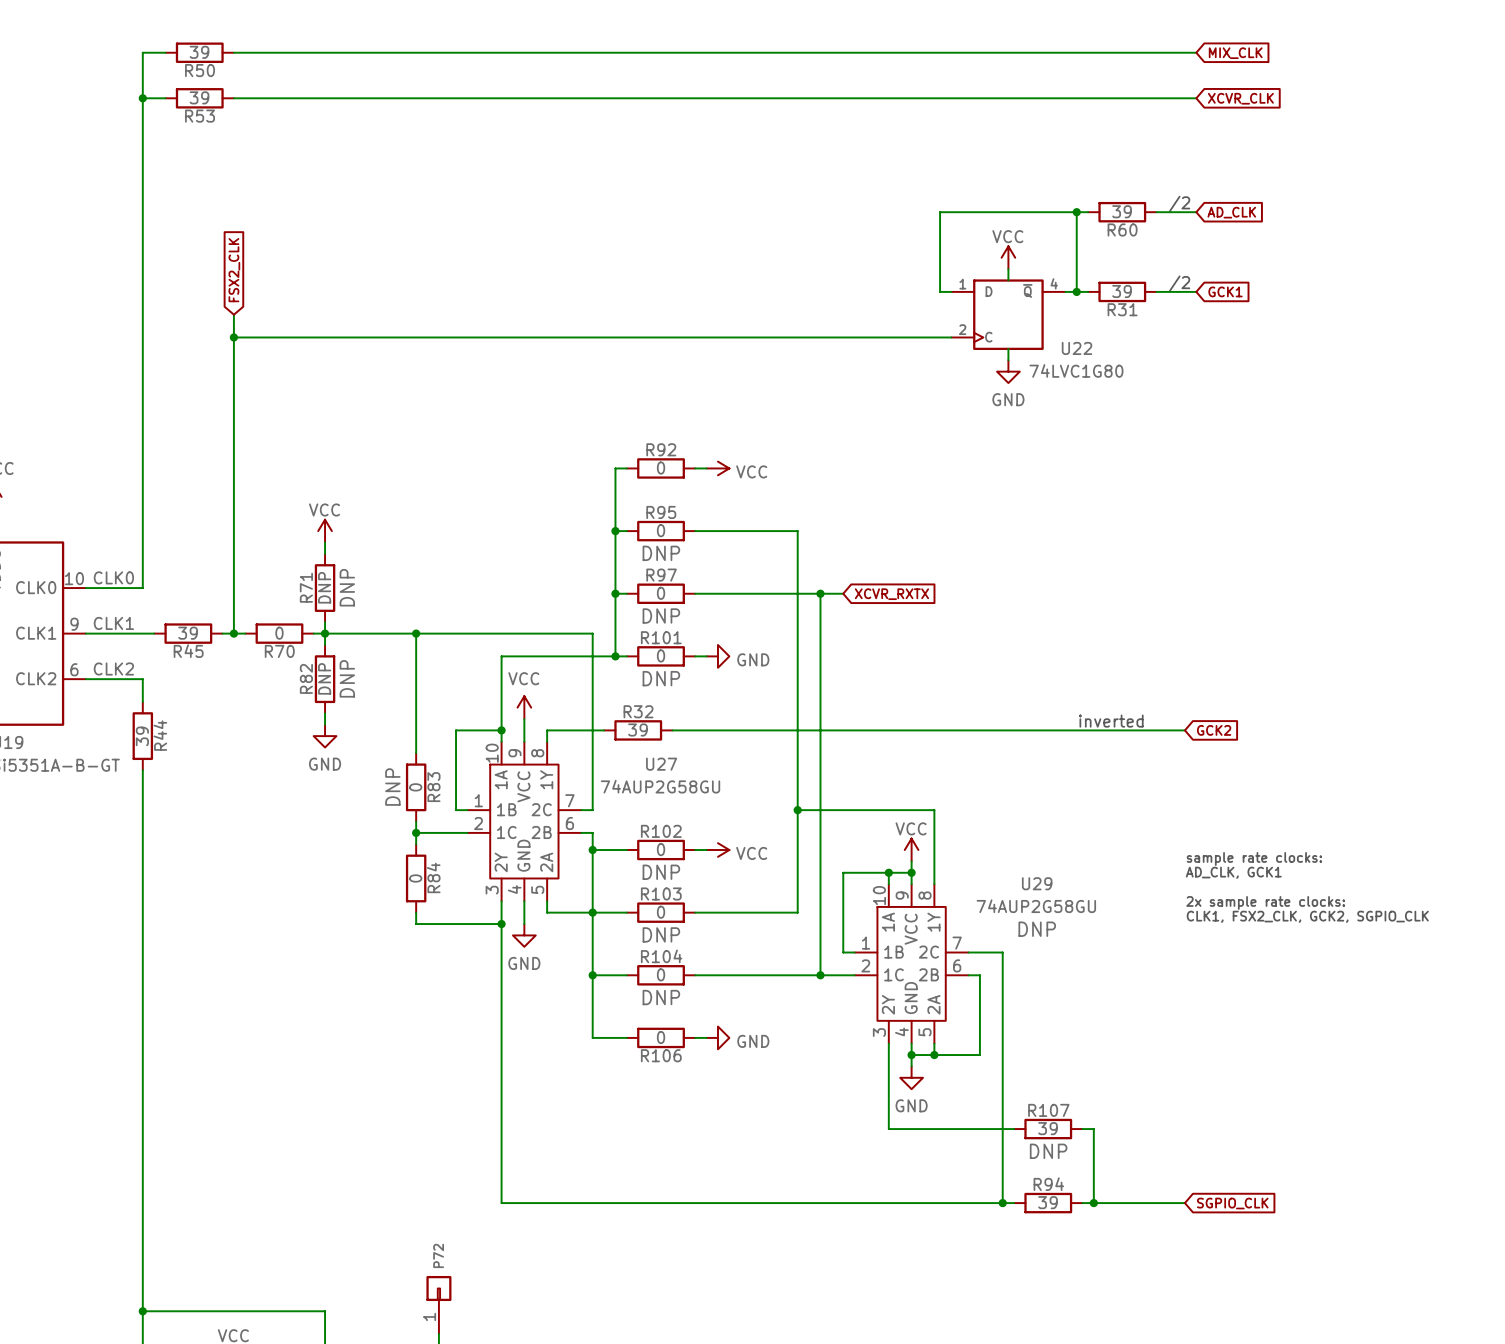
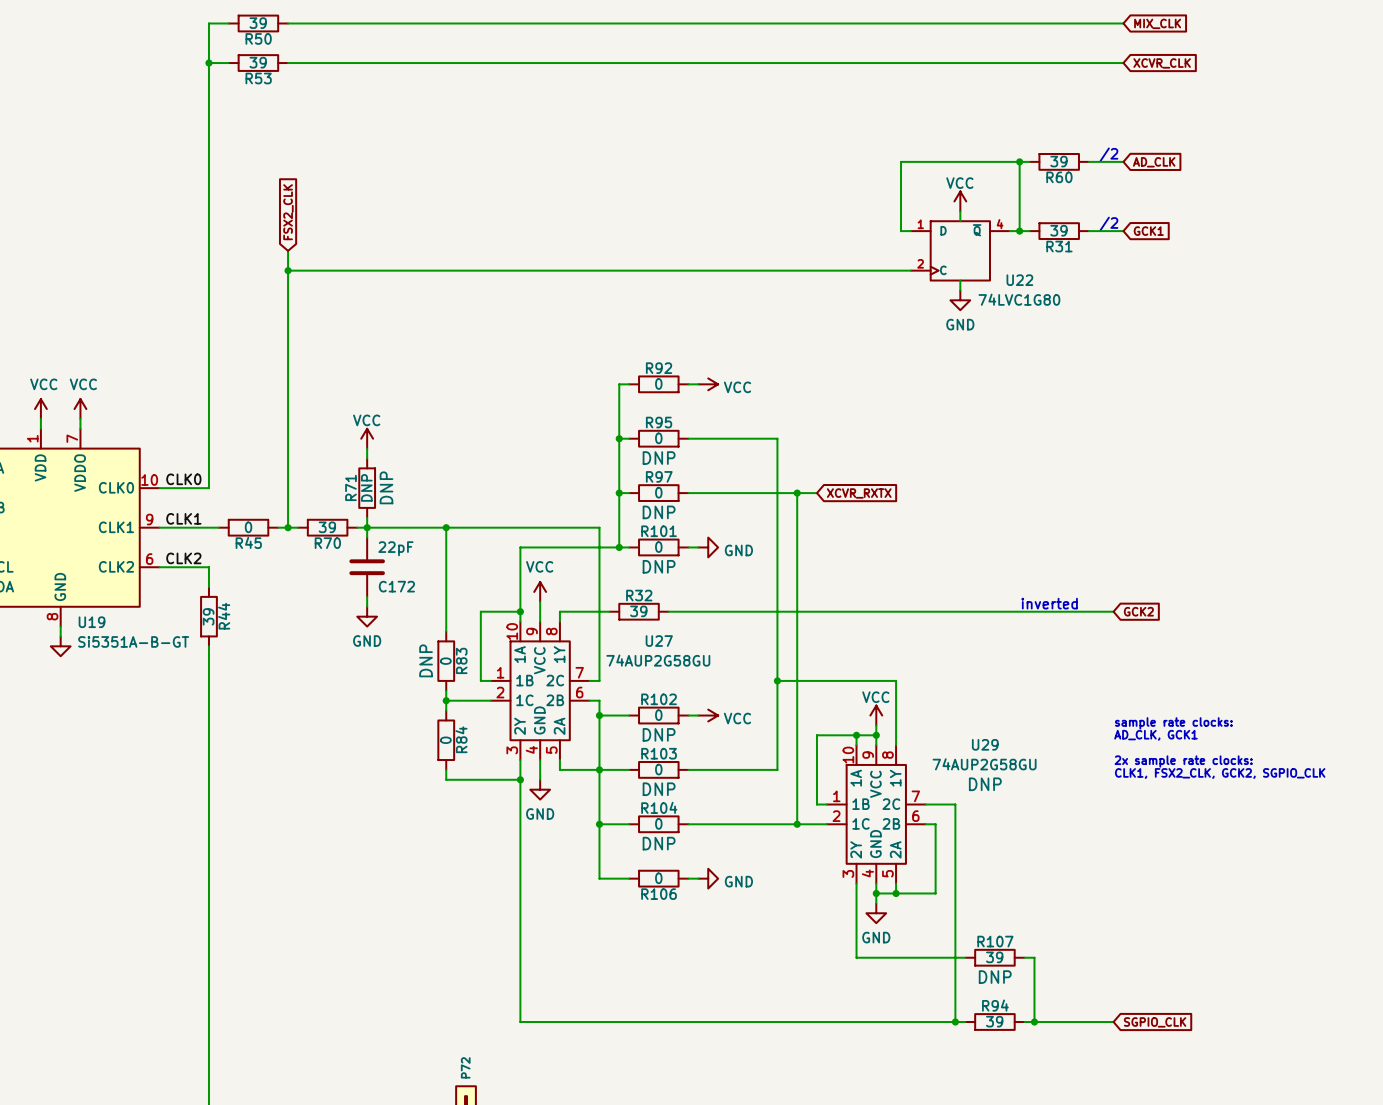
R45 value: 39 (188, 633) -> 0 (248, 527)
R70 value: 0 (279, 633) -> 39 (327, 527)
R82: DNP (325, 679) -> none
C172: none -> 22pF (367, 567)

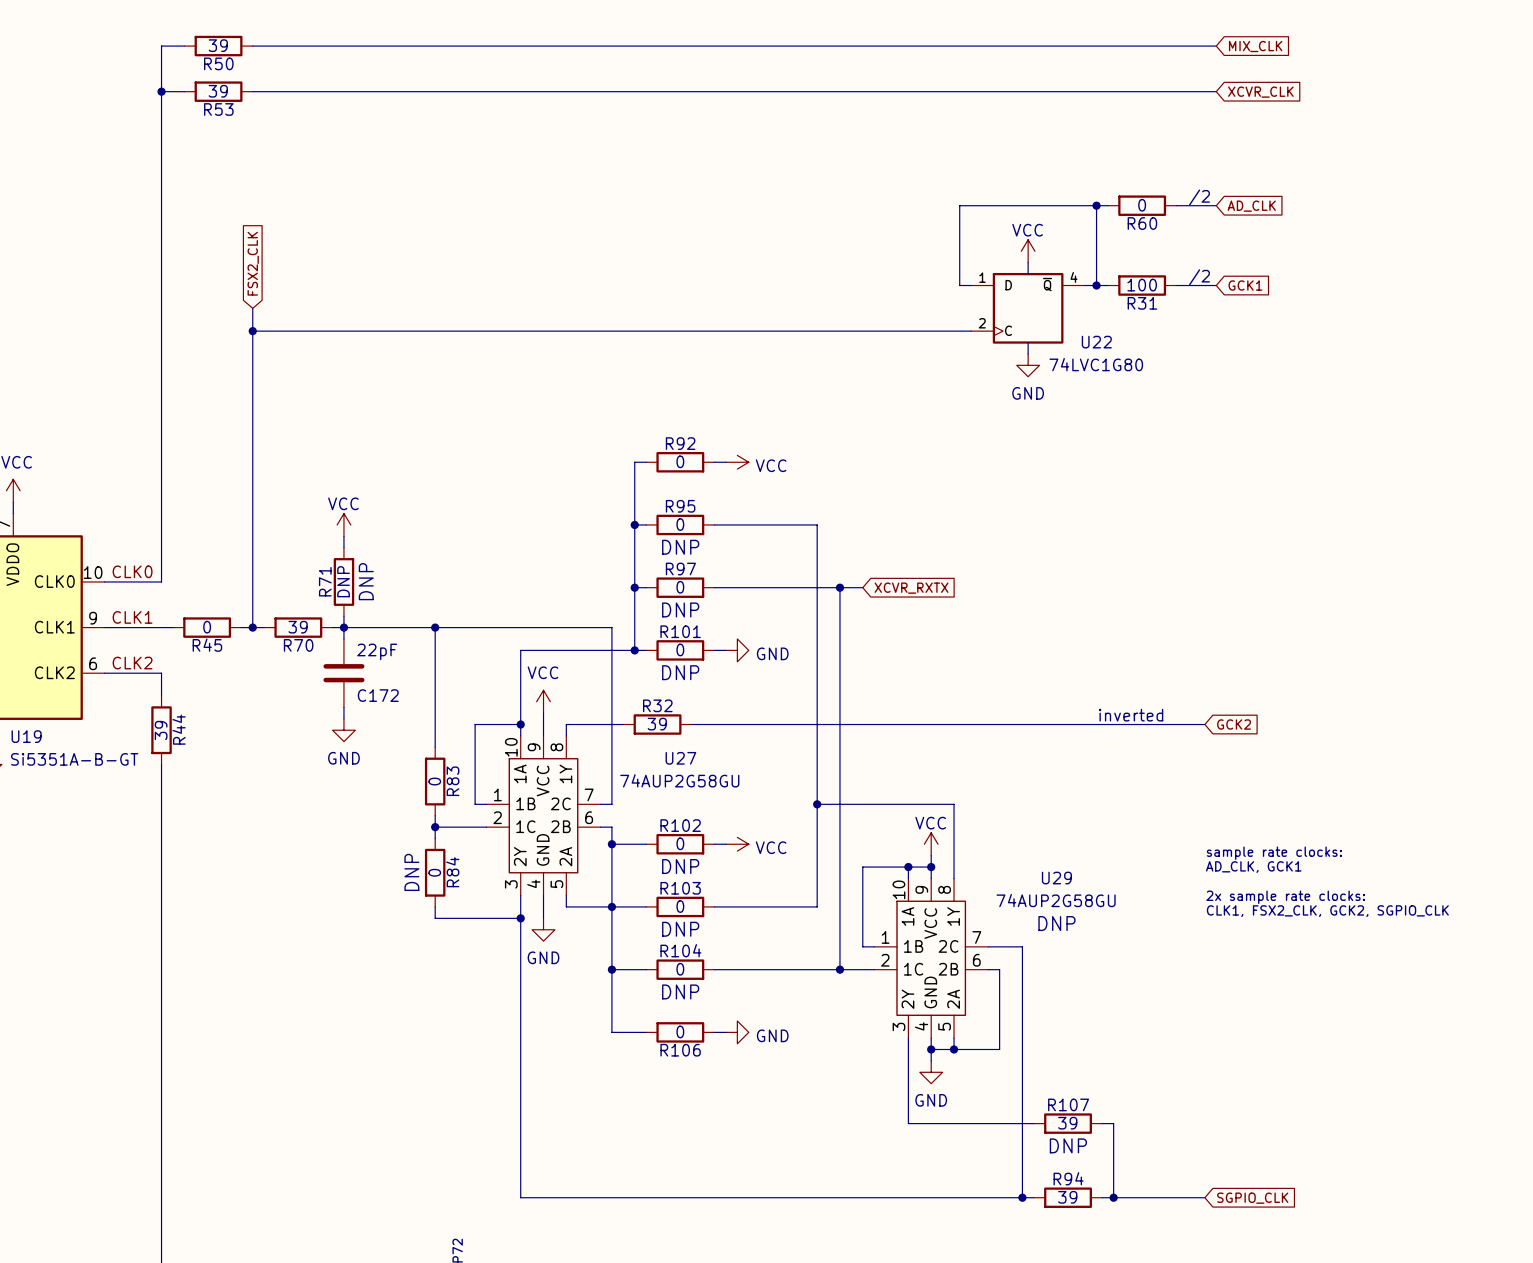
R60 value: 39 (1058, 161) -> 0 (1142, 205)
R31 value: 39 (1058, 230) -> 100 (1142, 285)
R83 text: DNP (426, 660) -> none
R84 text: none -> DNP (411, 872)

